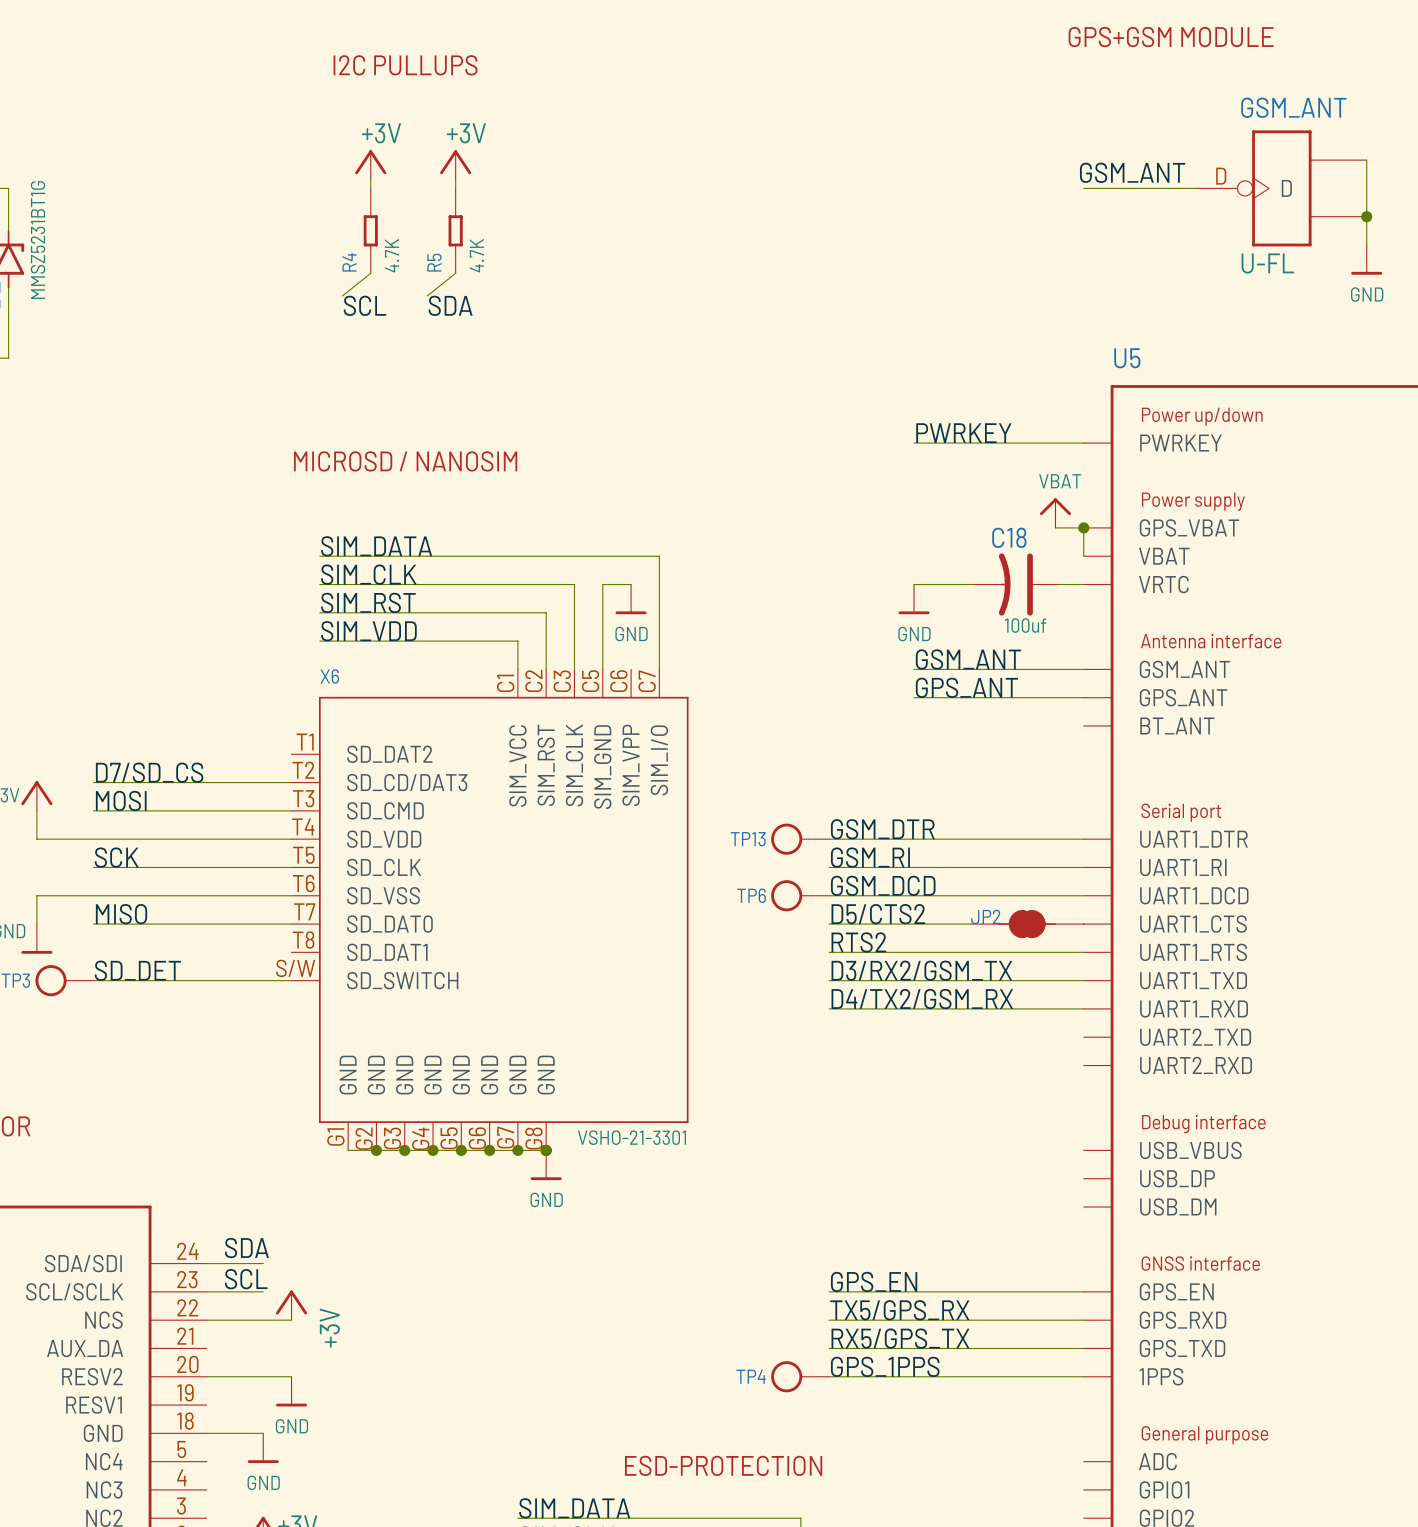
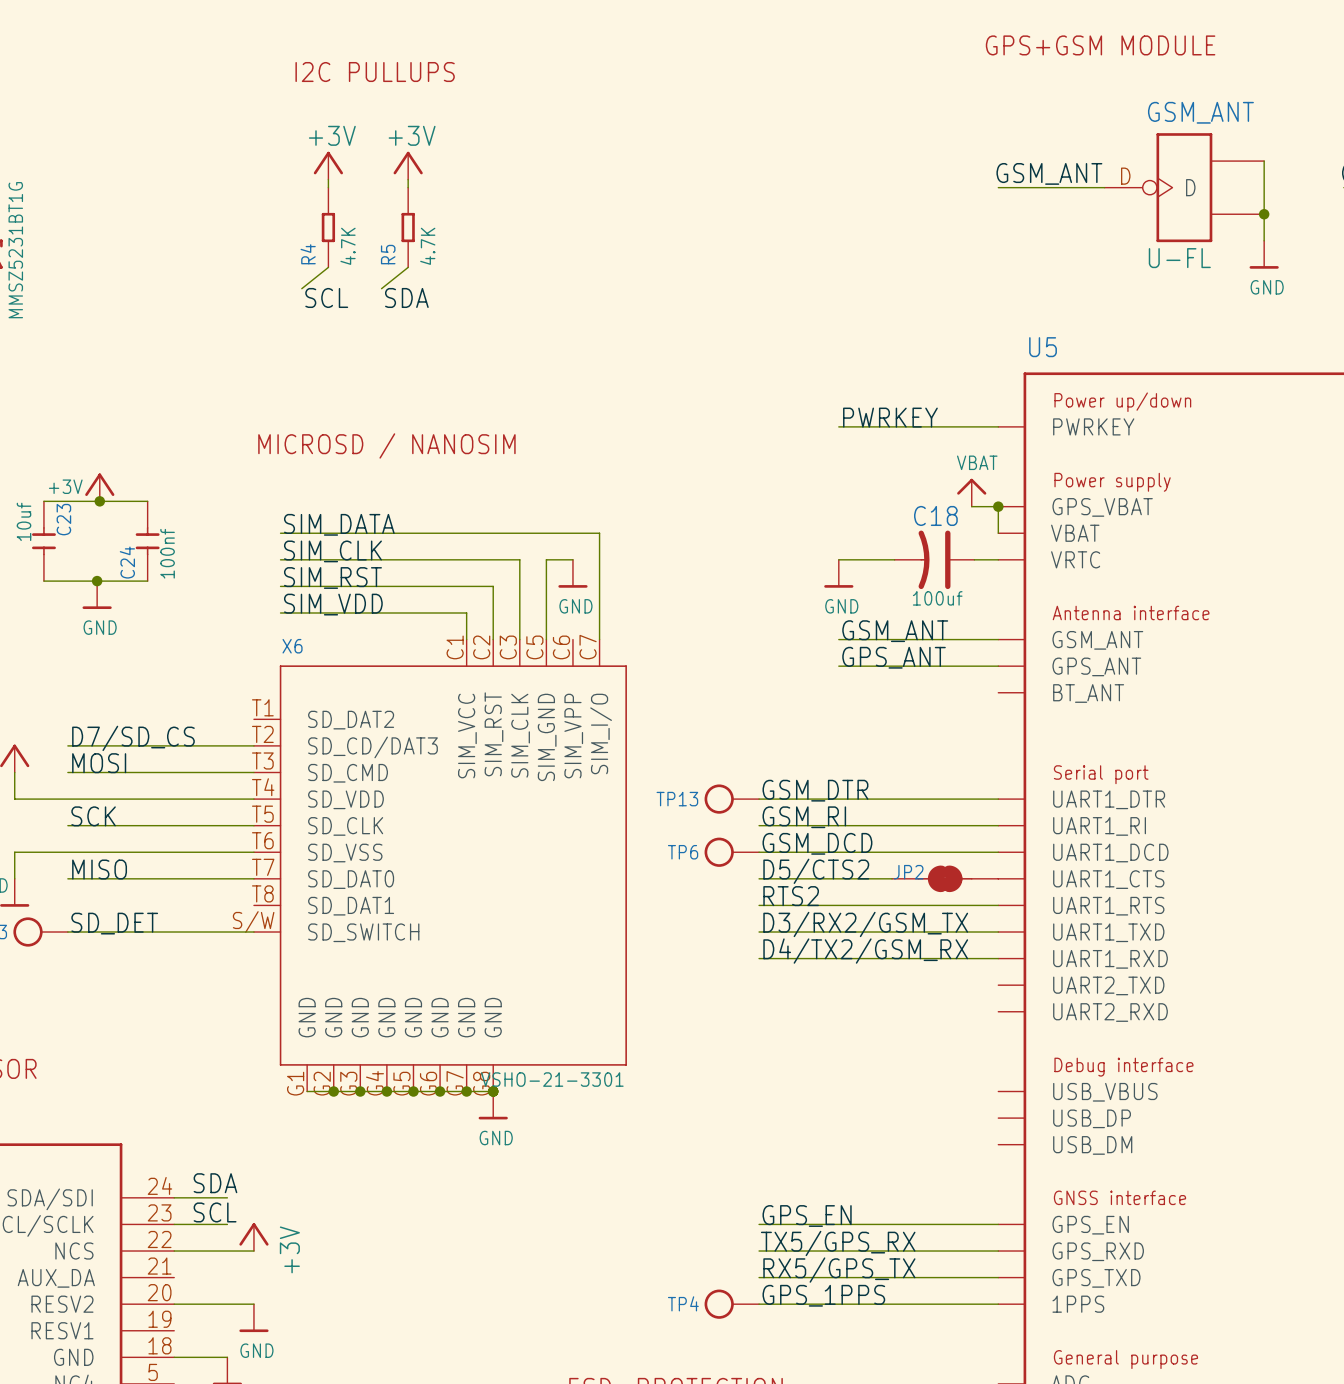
power symbol: none -> +3V (99, 487)
wire: none -> (43, 501) (147, 501)
junction: none -> (99, 501)
C23: none -> 10uf (43, 541)
C24: none -> 100nf (147, 541)
wire: none -> (43, 581) (147, 581)
junction: none -> (97, 581)
power symbol: none -> GND (97, 595)

